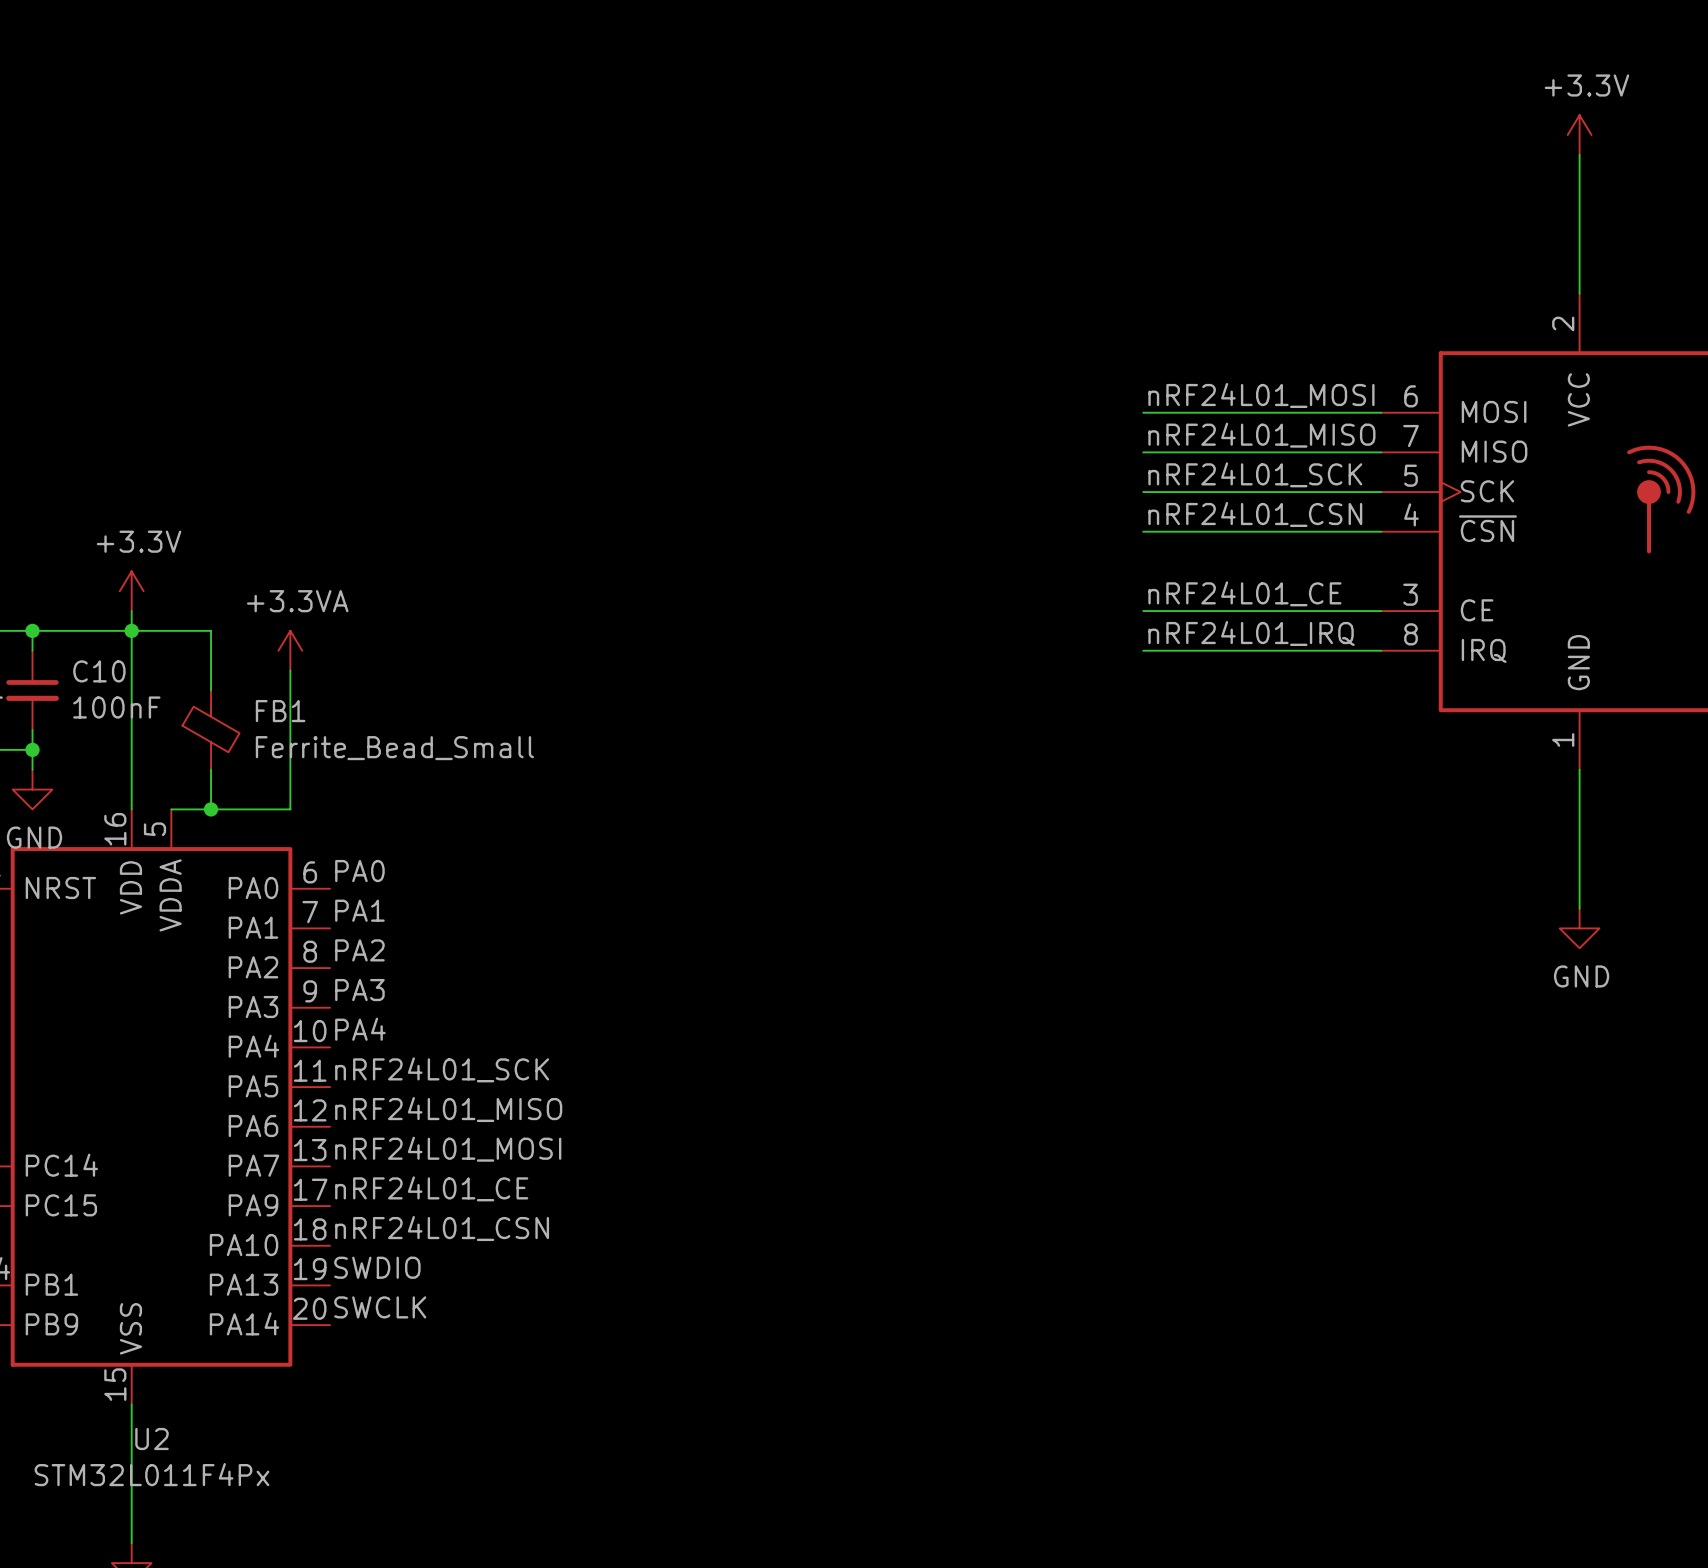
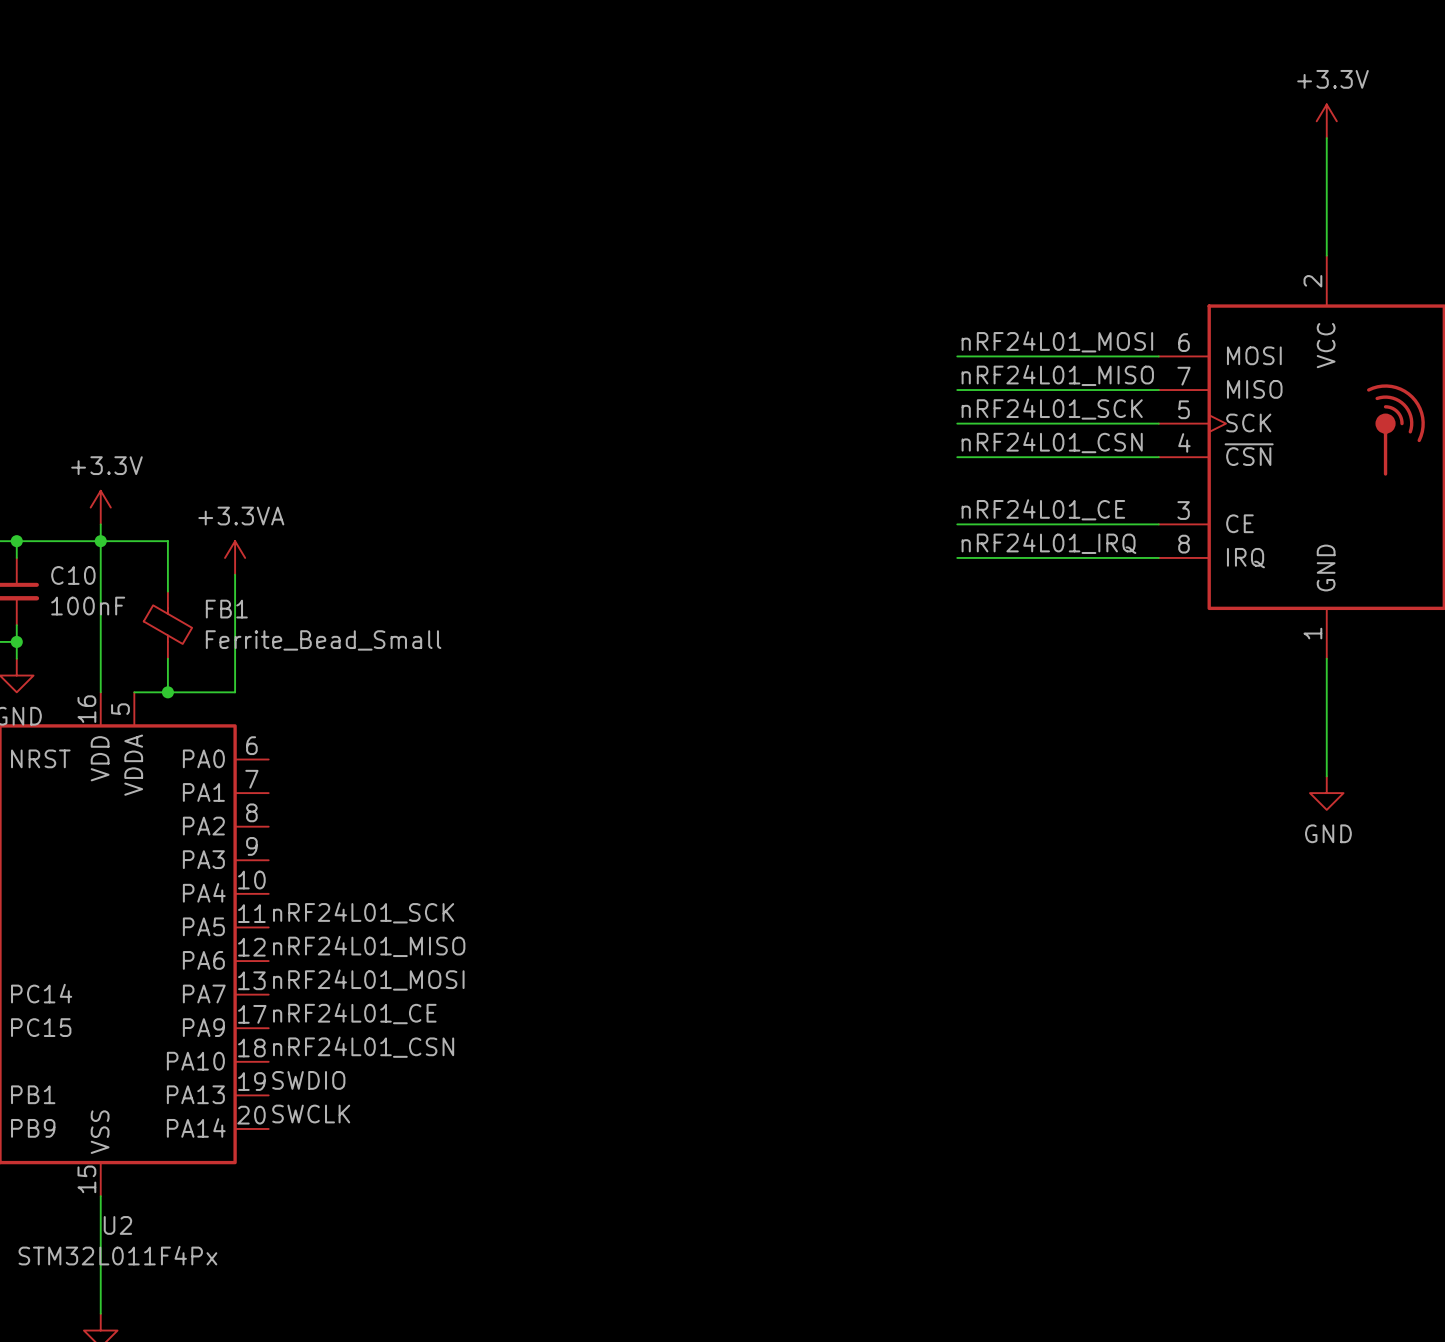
label: PA0 (359, 871) -> none
label: PA1 (359, 910) -> none
label: PA2 (359, 950) -> none
label: PA3 (359, 990) -> none
label: PA4 (360, 1029) -> none

